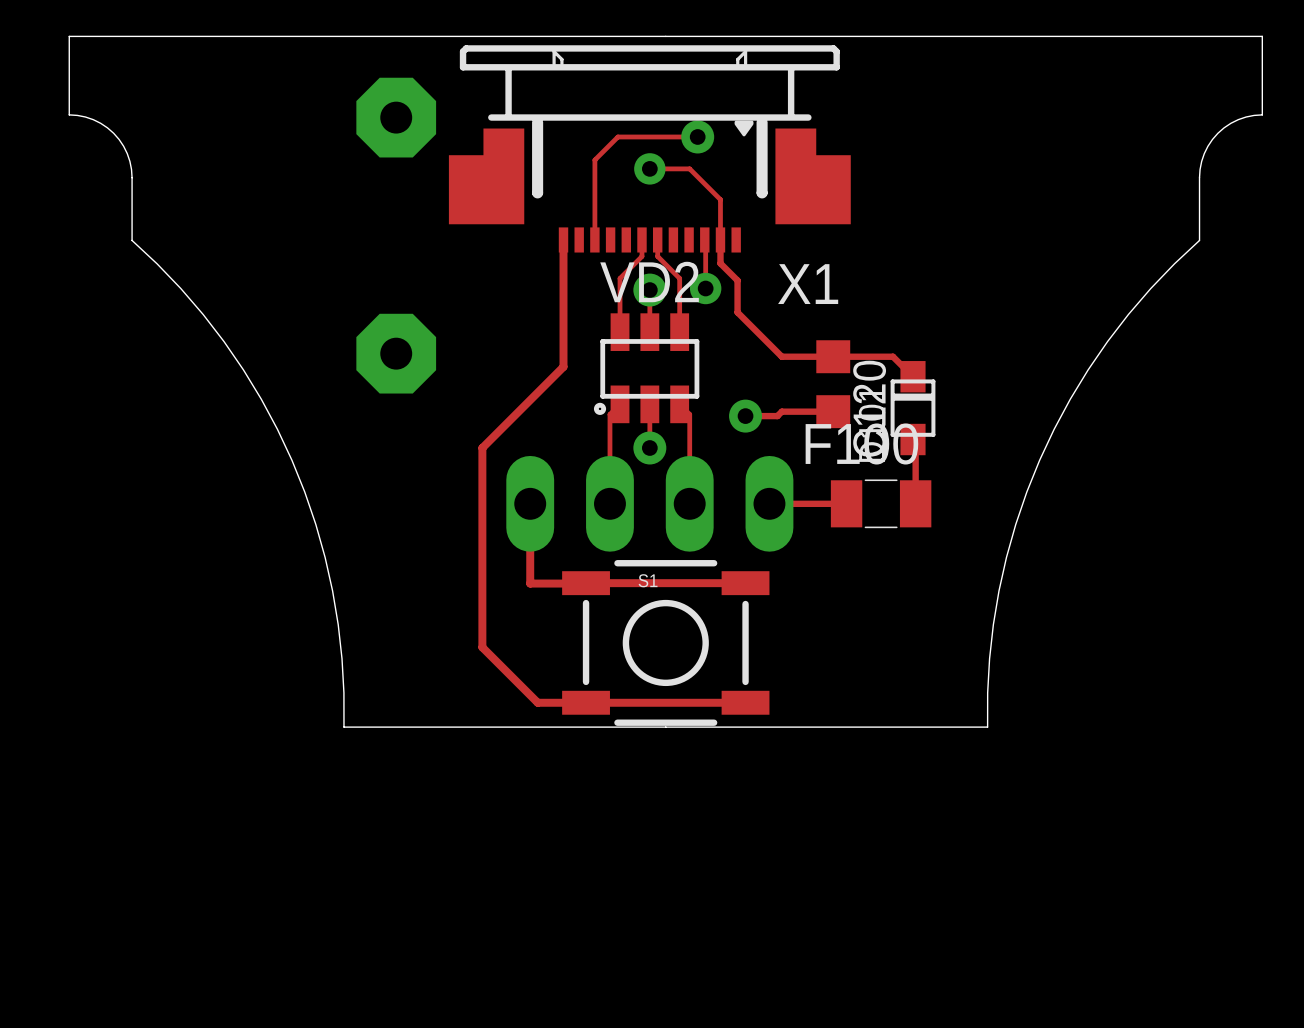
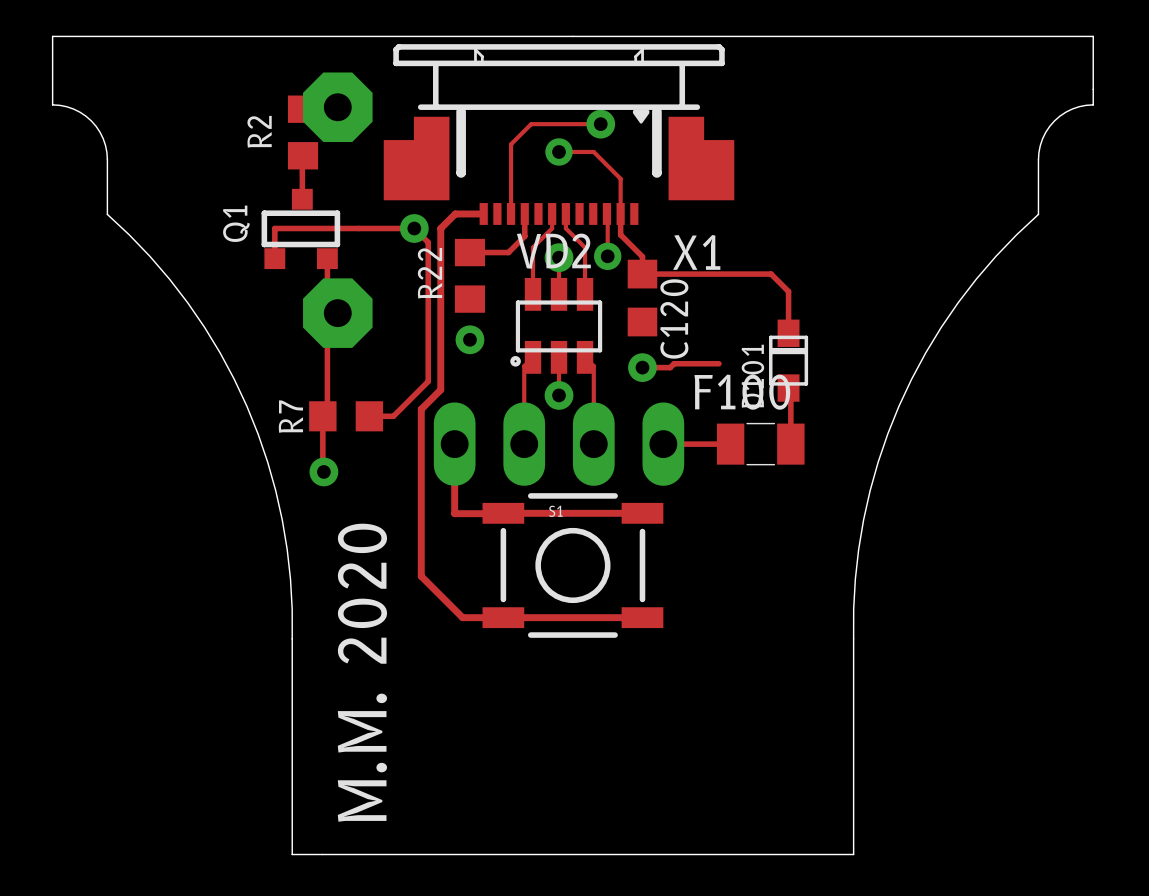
R2: none -> (303, 132)
track: none -> (303, 155) (302, 199)
track: (563, 239) (563, 366) (482, 447) (482, 647) (539, 702) -> (483, 213) (455, 213) (440, 228) (440, 389) (421, 409) (421, 576) (462, 617)
track: none -> (524, 213) (524, 236) (508, 252) (469, 252)
via: none -> (414, 228)
Q1: none -> (300, 228)
track: (720, 263) (737, 280) (737, 312) (781, 356) (893, 356) (913, 376) -> (620, 234) (642, 256) (642, 274) (771, 274) (788, 291) (788, 333)
track: none -> (274, 258) (274, 228) (414, 228) (428, 242) (428, 381) (393, 416) (369, 416)
track: none -> (327, 258) (327, 411) (322, 416) (323, 471)
R22: none -> (469, 275)
via: none -> (469, 339)
C120 position: (833, 384) -> (642, 298)
R7: none -> (346, 416)
via: none -> (323, 471)
board edge: (343, 727) (987, 727) -> (292, 638) (292, 854) (853, 854) (853, 638)
text: none -> M.M. 2020 (362, 672)

